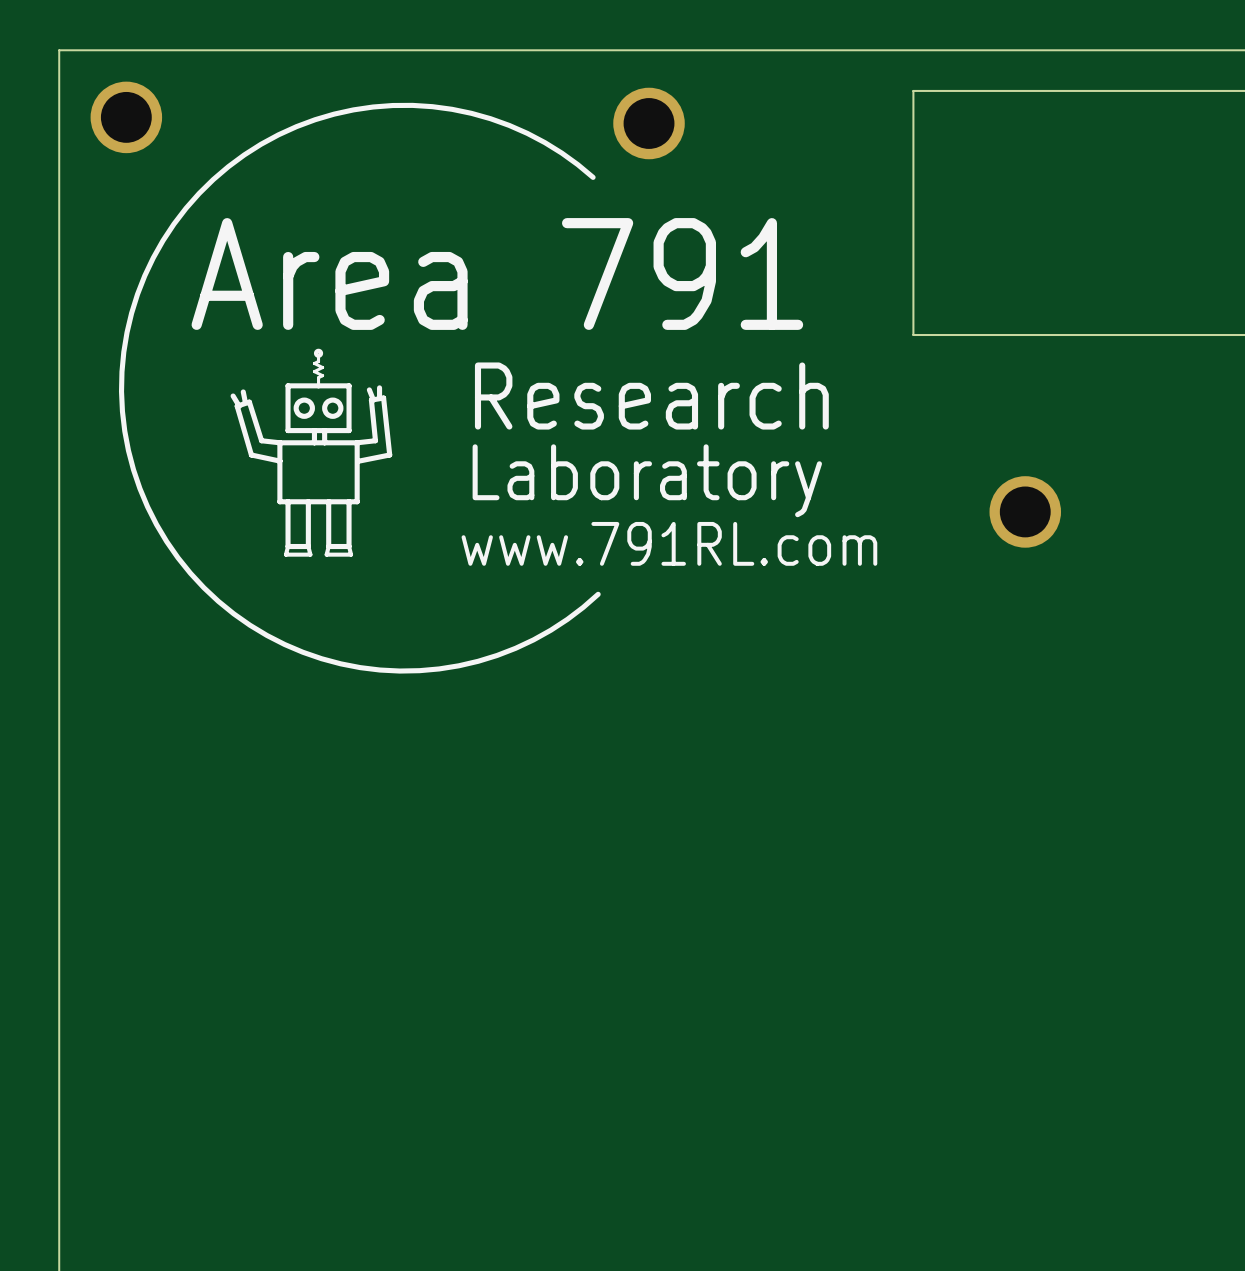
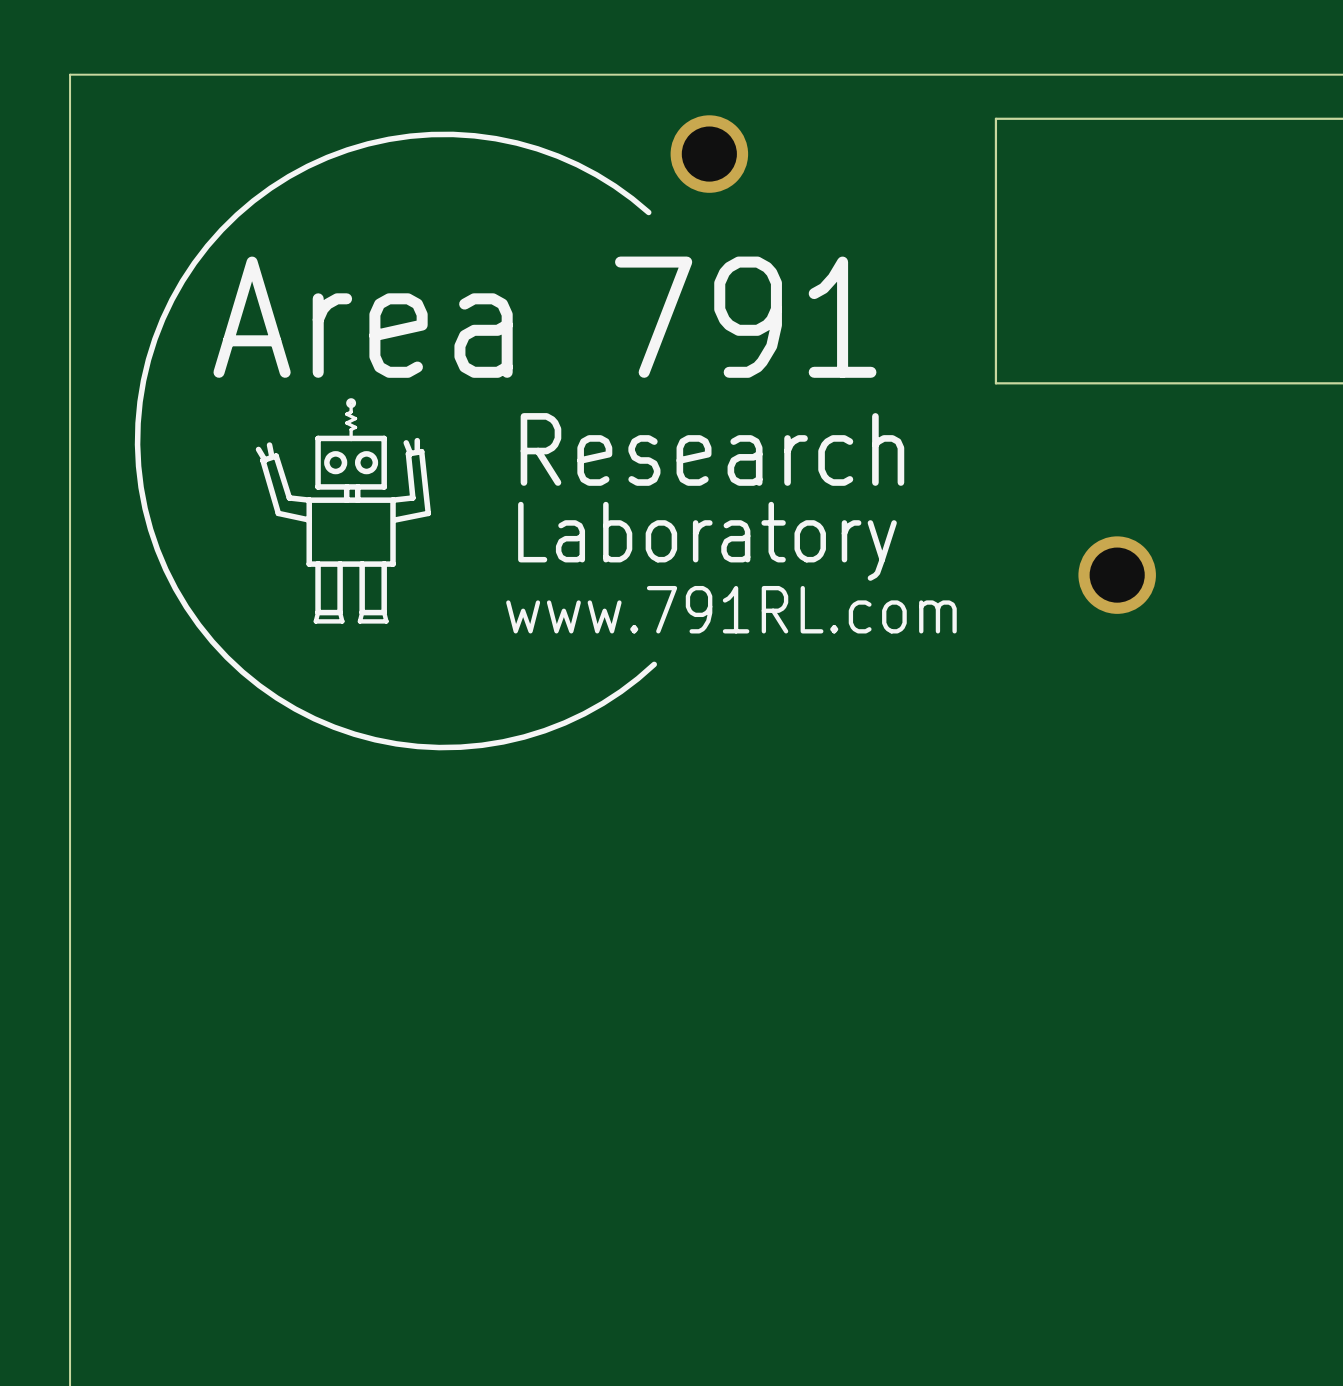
via: (126, 117) -> none

